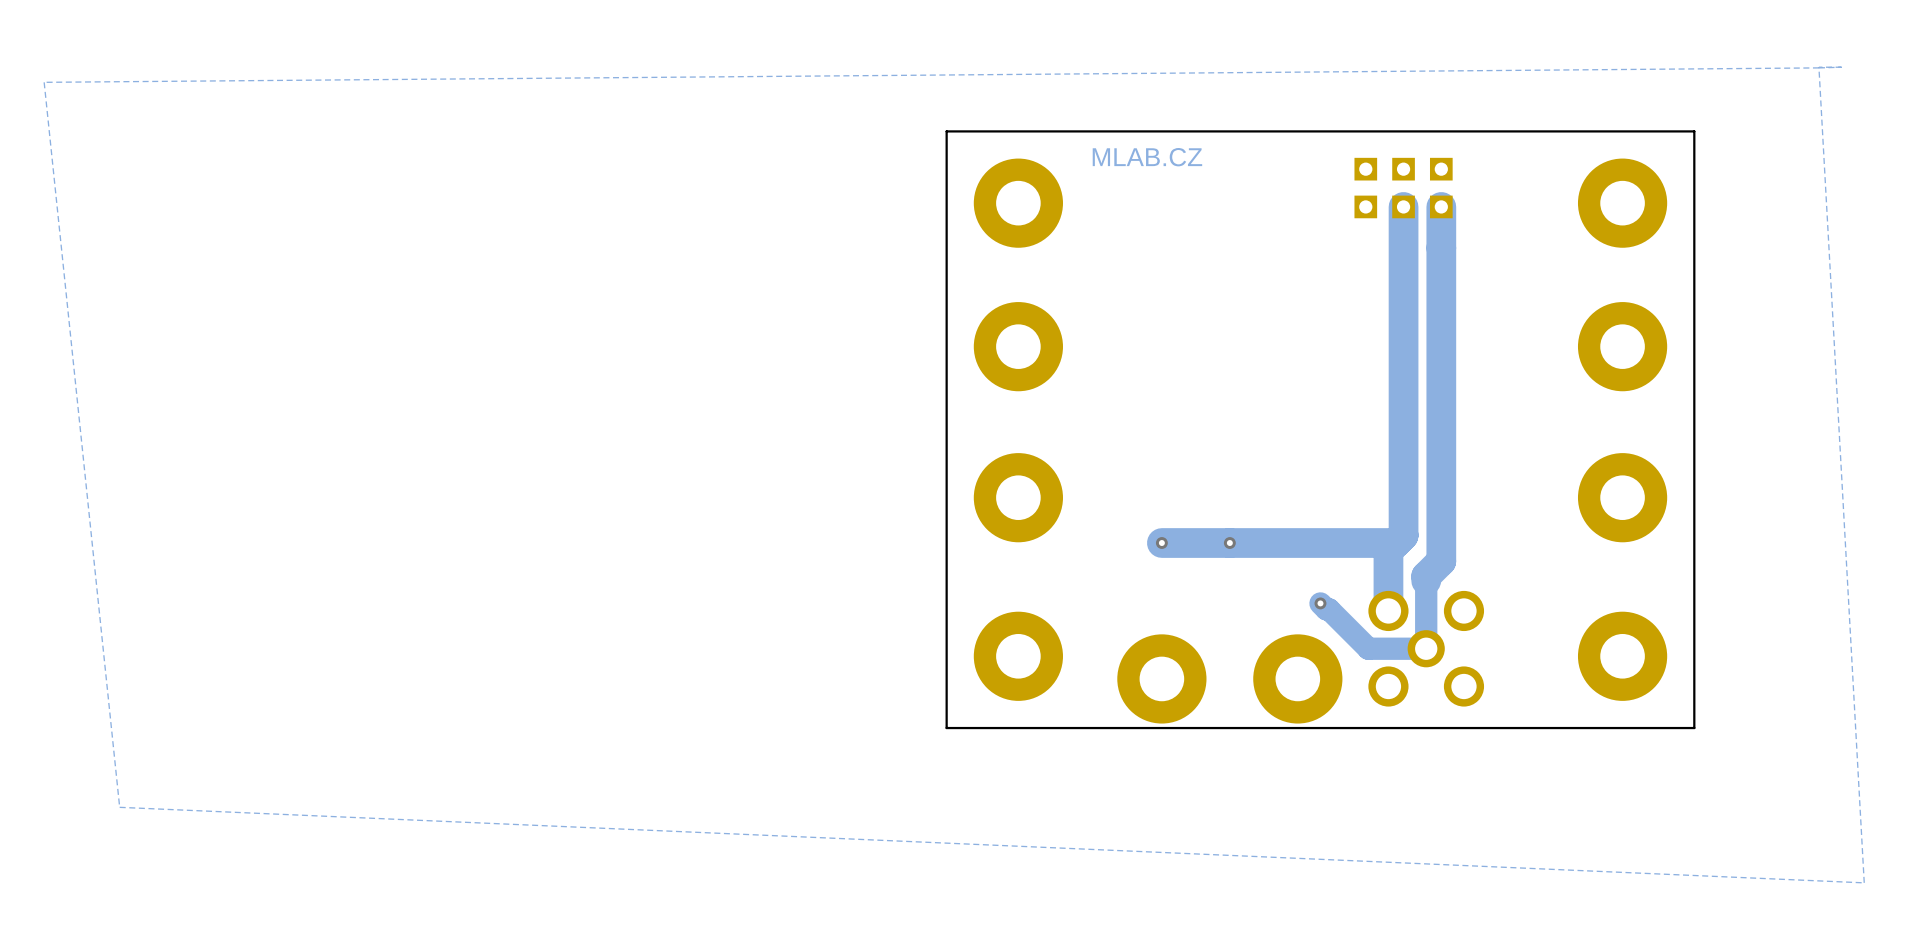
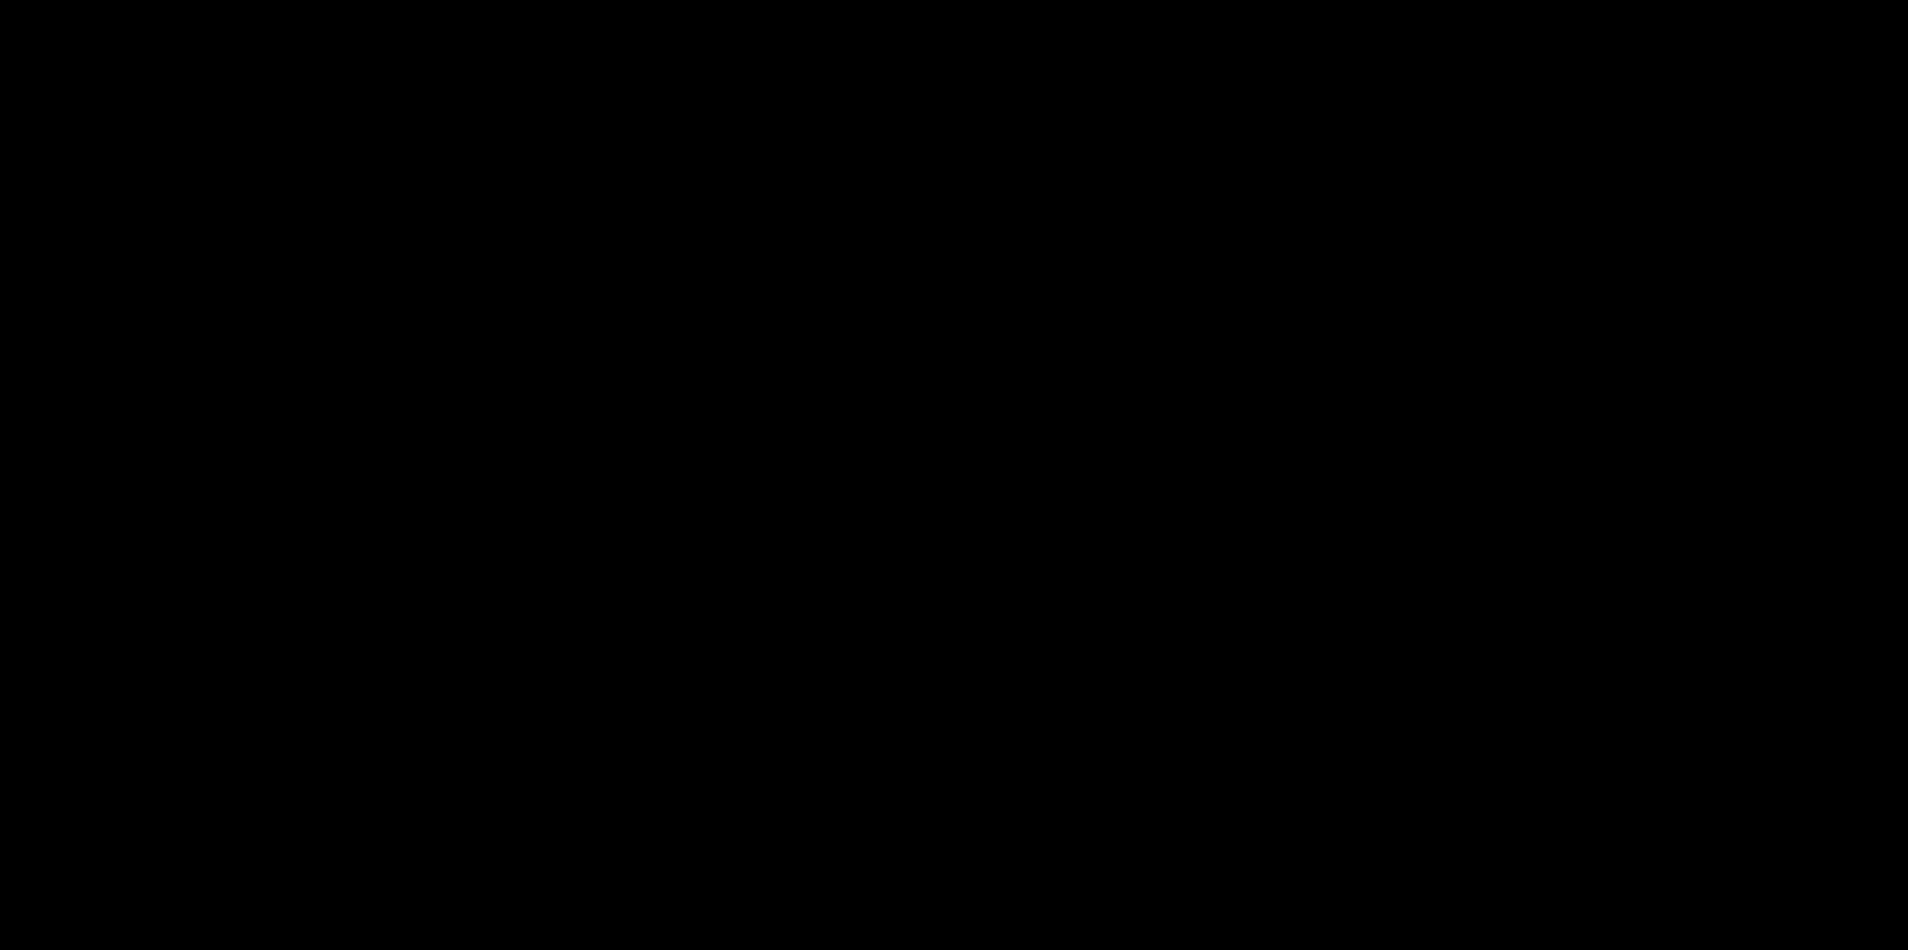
zone outline: (1841, 67) (1818, 67) (1864, 882) (119, 807) (44, 82) (1818, 67) (1841, 67) -> none
board edge: (1694, 131) (1694, 728) (946, 728) (946, 131) (1694, 131) -> none
text: MLAB.CZ (1147, 157) -> none
part: (1403, 188) -> none
part: (1018, 203) -> none
part: (1622, 203) -> none
track: (1403, 206) (1403, 535) (1388, 550) (1388, 610) -> none
track: (1441, 206) (1441, 561) (1426, 576) (1426, 648) (1368, 648) (1329, 609) (1326, 609) (1320, 603) -> none
part: (1018, 346) -> none
part: (1622, 346) -> none
part: (1018, 497) -> none
part: (1622, 497) -> none
via: (1161, 543) -> none
via: (1229, 543) -> none
track: (1396, 543) (1161, 543) -> none
via: (1320, 603) -> none
part: (1426, 648) -> none
part: (1018, 656) -> none
part: (1622, 656) -> none
part: (1161, 678) -> none
part: (1297, 678) -> none

